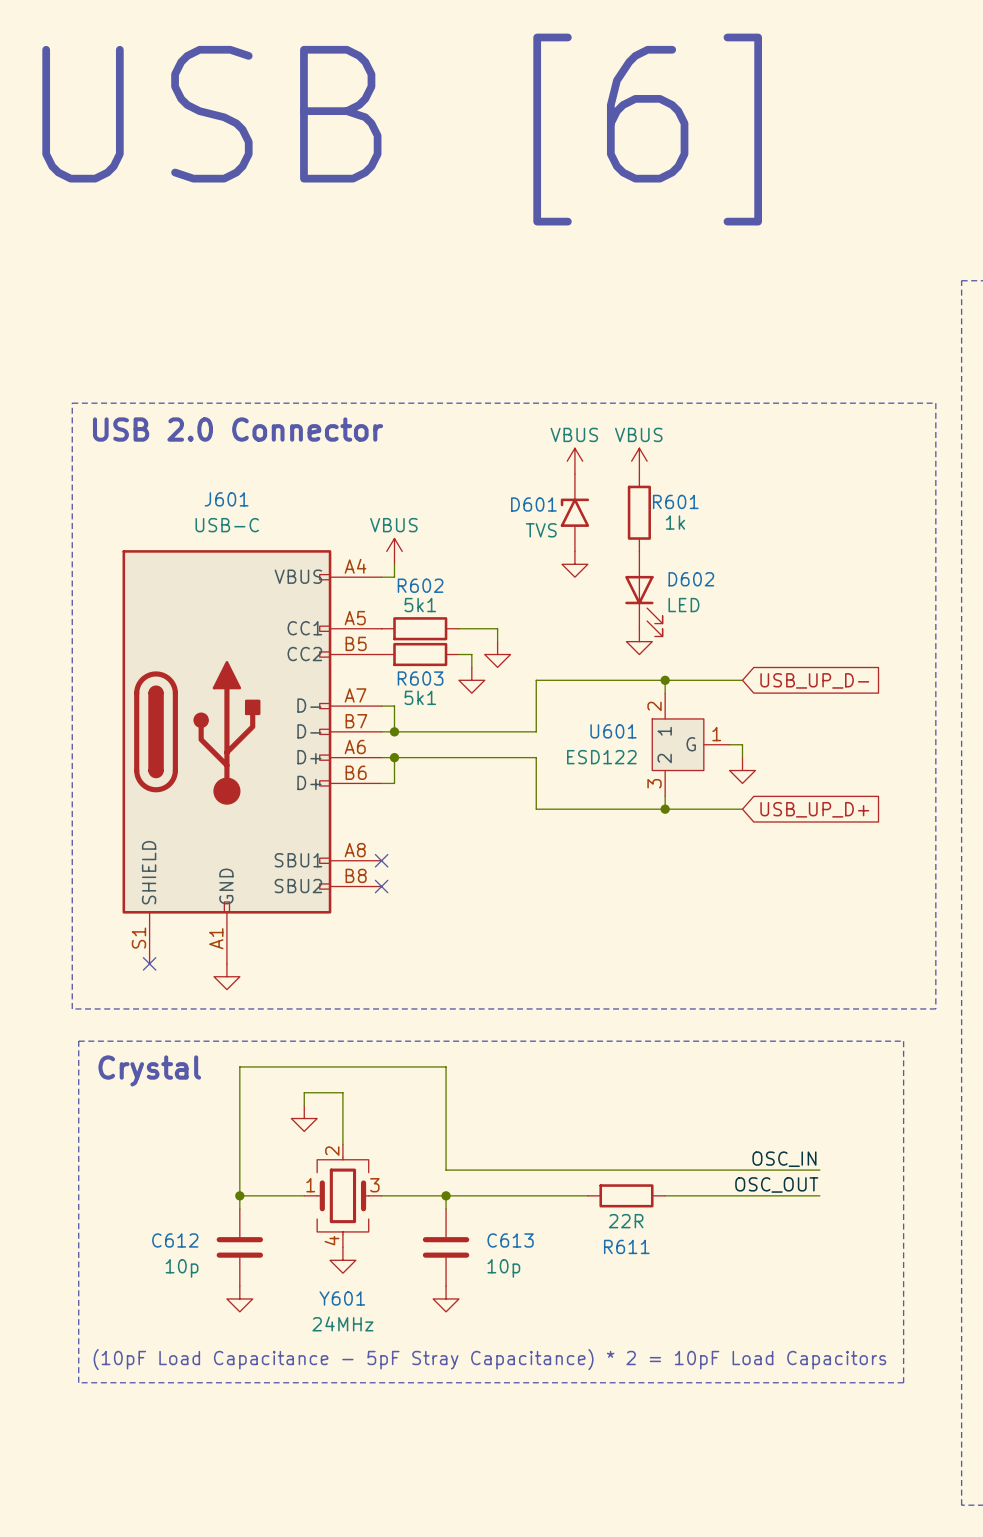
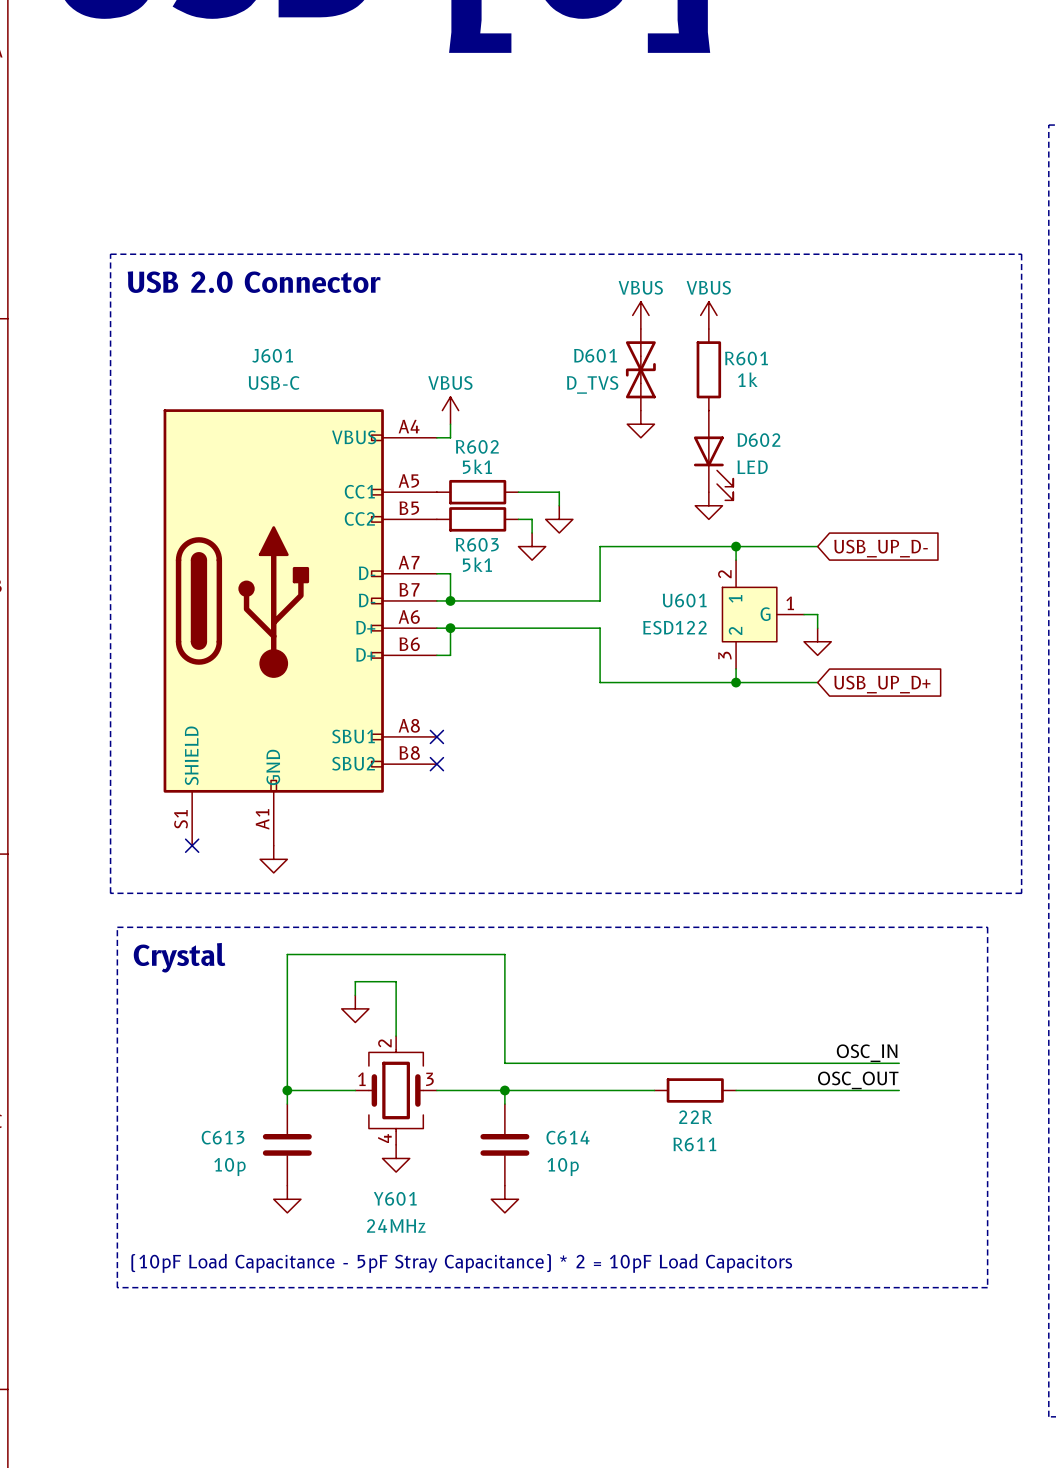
D601 symbol: [560, 474, 590, 552] -> [625, 329, 656, 411]
D601 value: TVS (541, 530) -> D_TVS (592, 384)
C612 name: C612 (175, 1240) -> C613 (223, 1137)
C613 name: C613 (510, 1240) -> C614 (568, 1137)

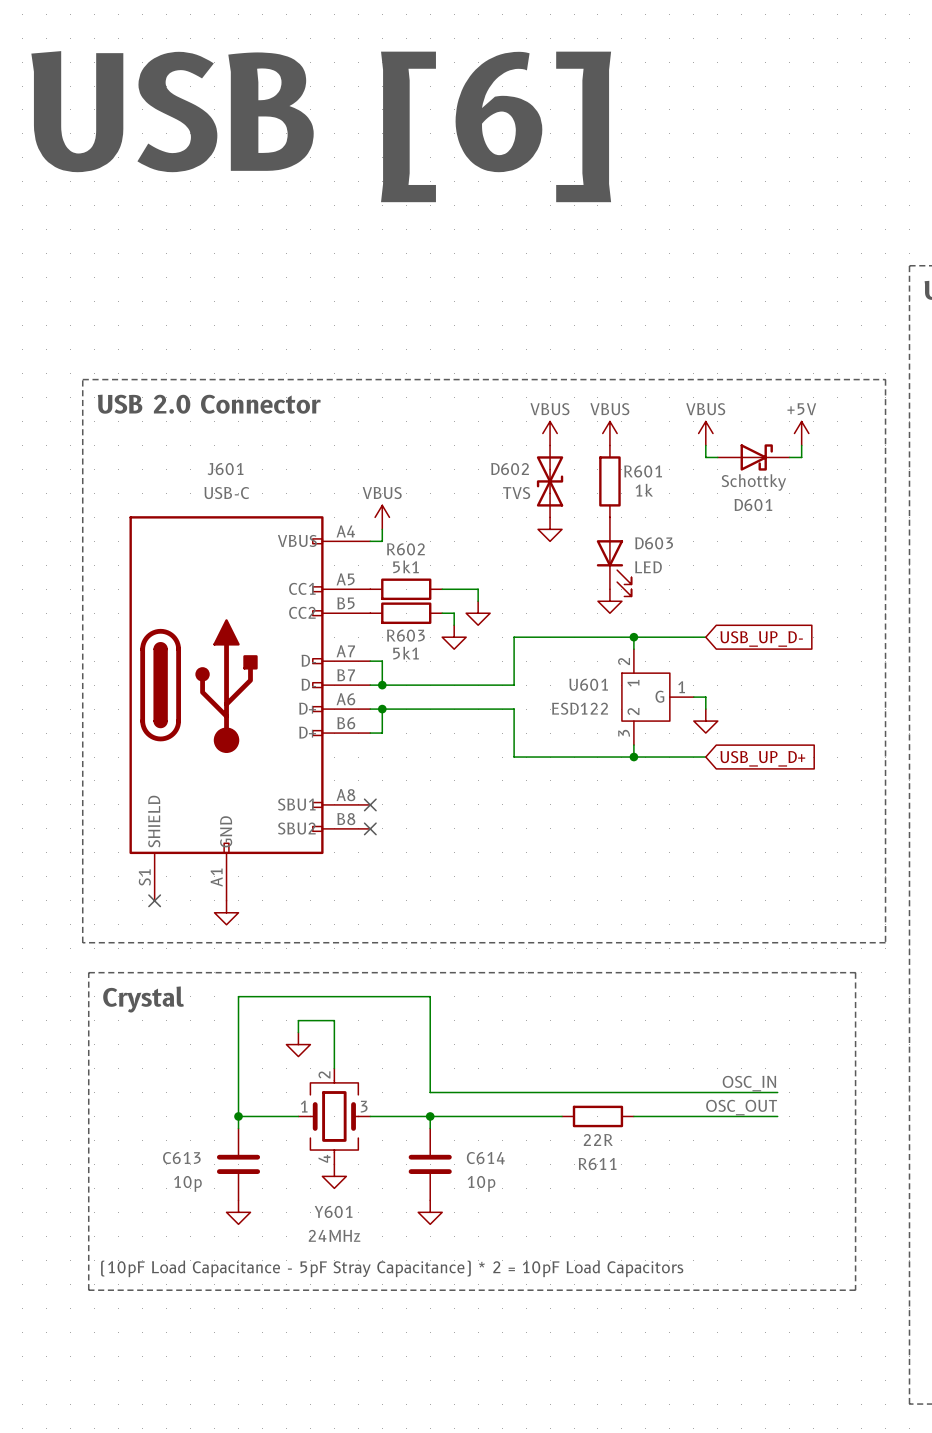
power symbol: none -> VBUS (705, 433)
power symbol: none -> +5V (801, 433)
wire: none -> (705, 445) (705, 457) (717, 457)
wire: none -> (801, 445) (801, 457) (789, 457)
D601: none -> Schottky (753, 457)
D601 name: D601 (595, 355) -> D602 (510, 469)
D601 value: D_TVS (592, 384) -> TVS (516, 493)
D602 name: D602 (758, 440) -> D603 (654, 543)

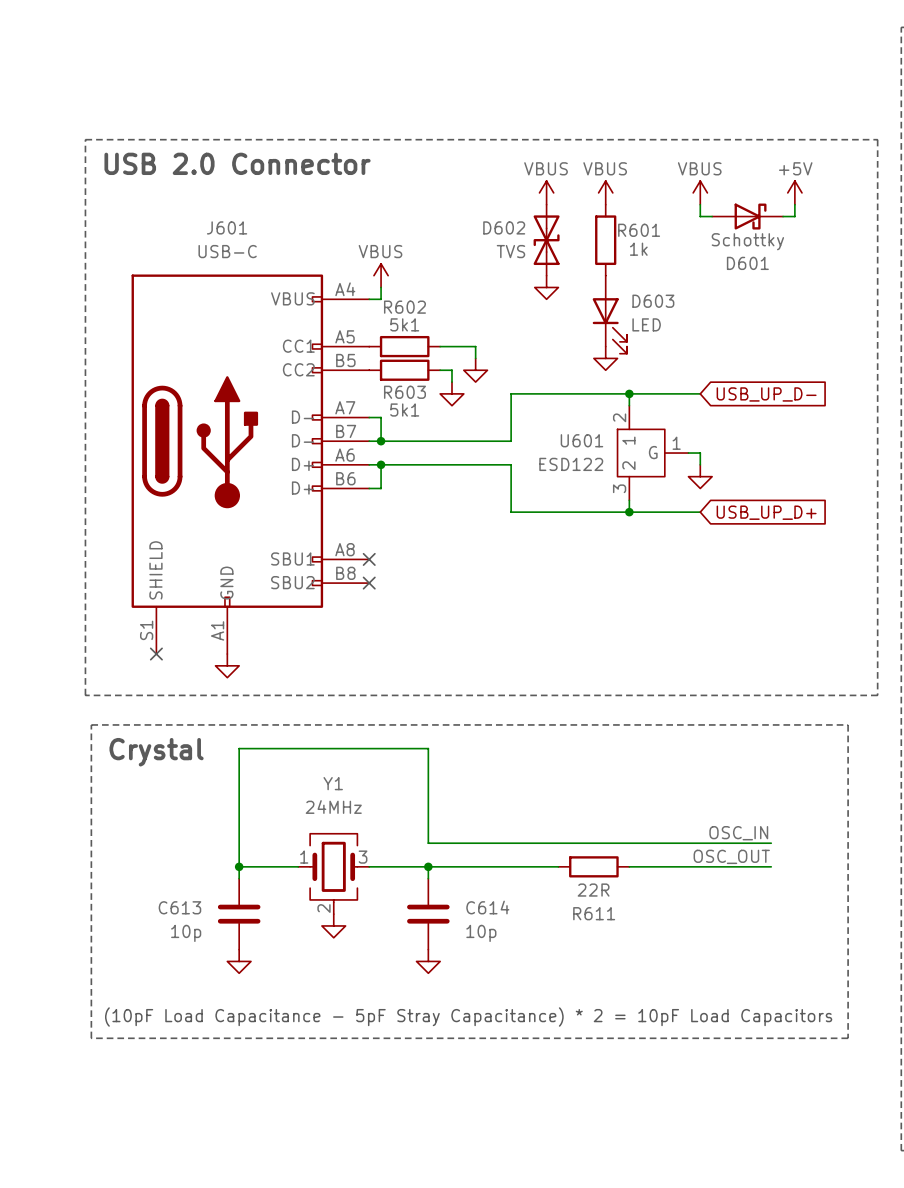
wire: (298, 1032) (298, 1020) (334, 1020) (334, 1068) -> none
power symbol: (298, 1044) -> none
Y601: 24MHz (334, 1116) -> none
Y1: none -> 24MHz (333, 873)

